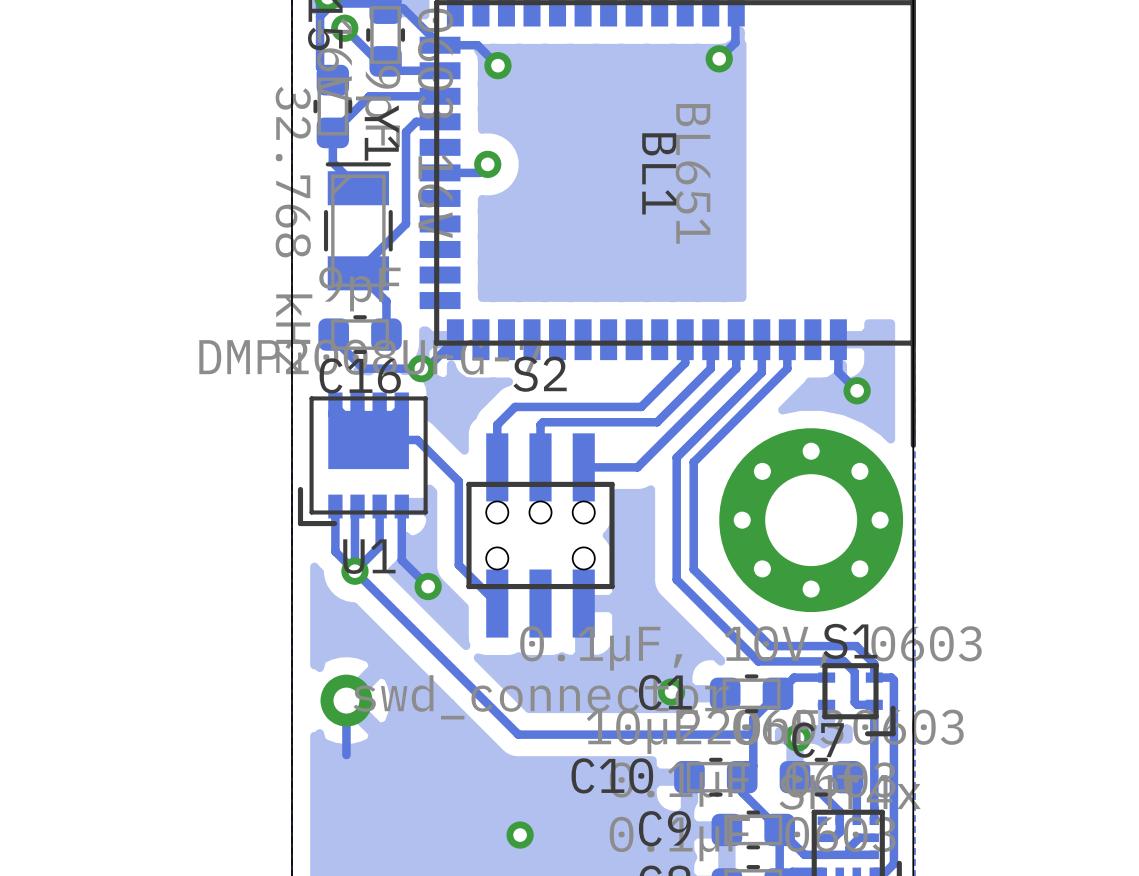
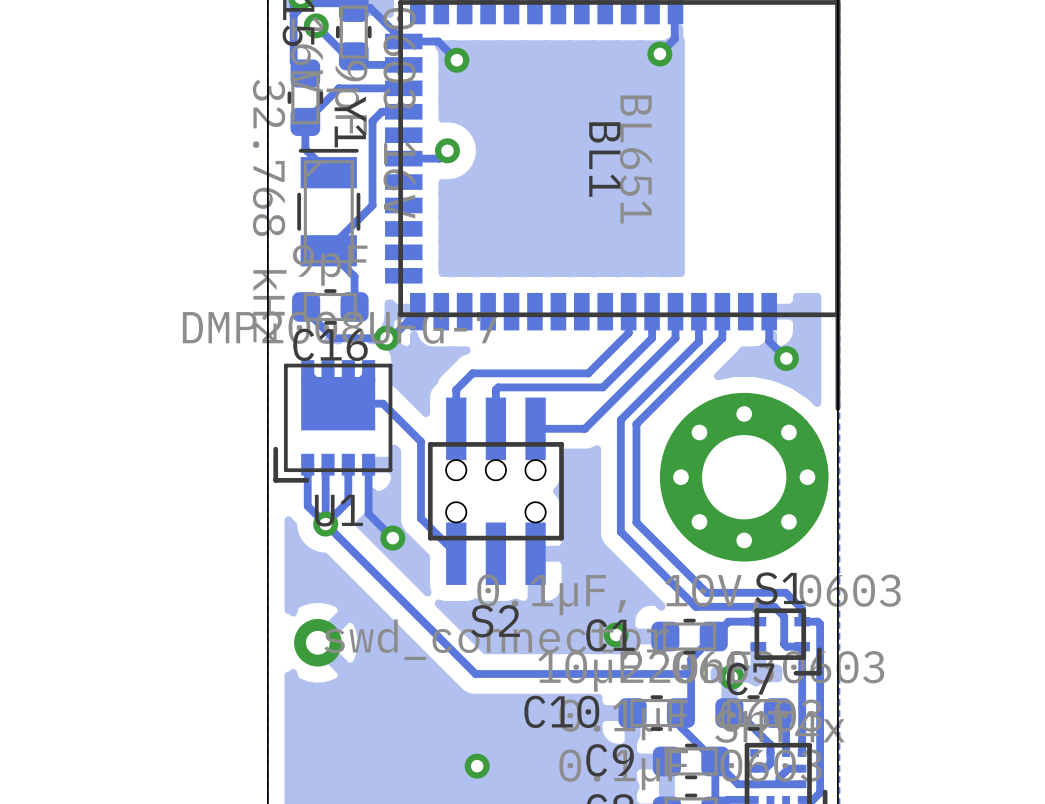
S2 name position: S2 (540, 374) -> S2 (495, 621)
track: (346, 700) (346, 755) -> none

